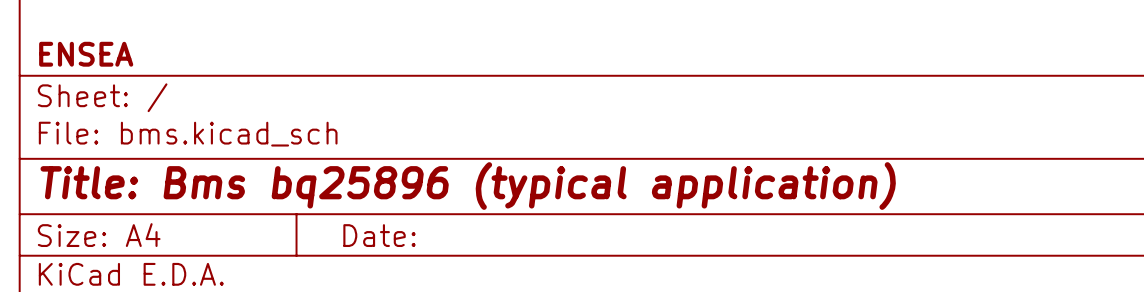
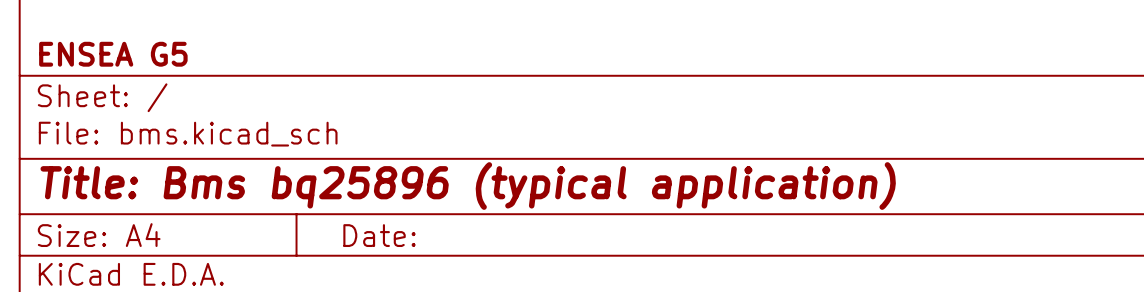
title block: ENSEA (86, 54) -> ENSEA G5 (113, 54)

